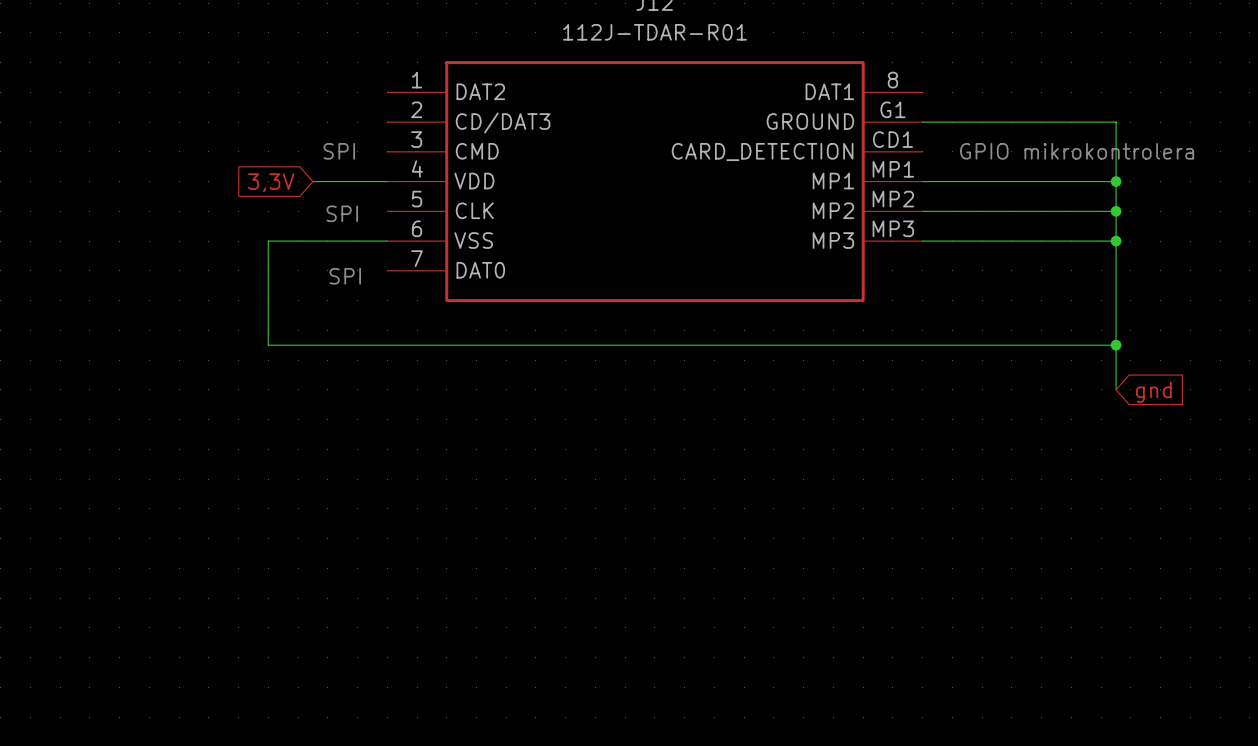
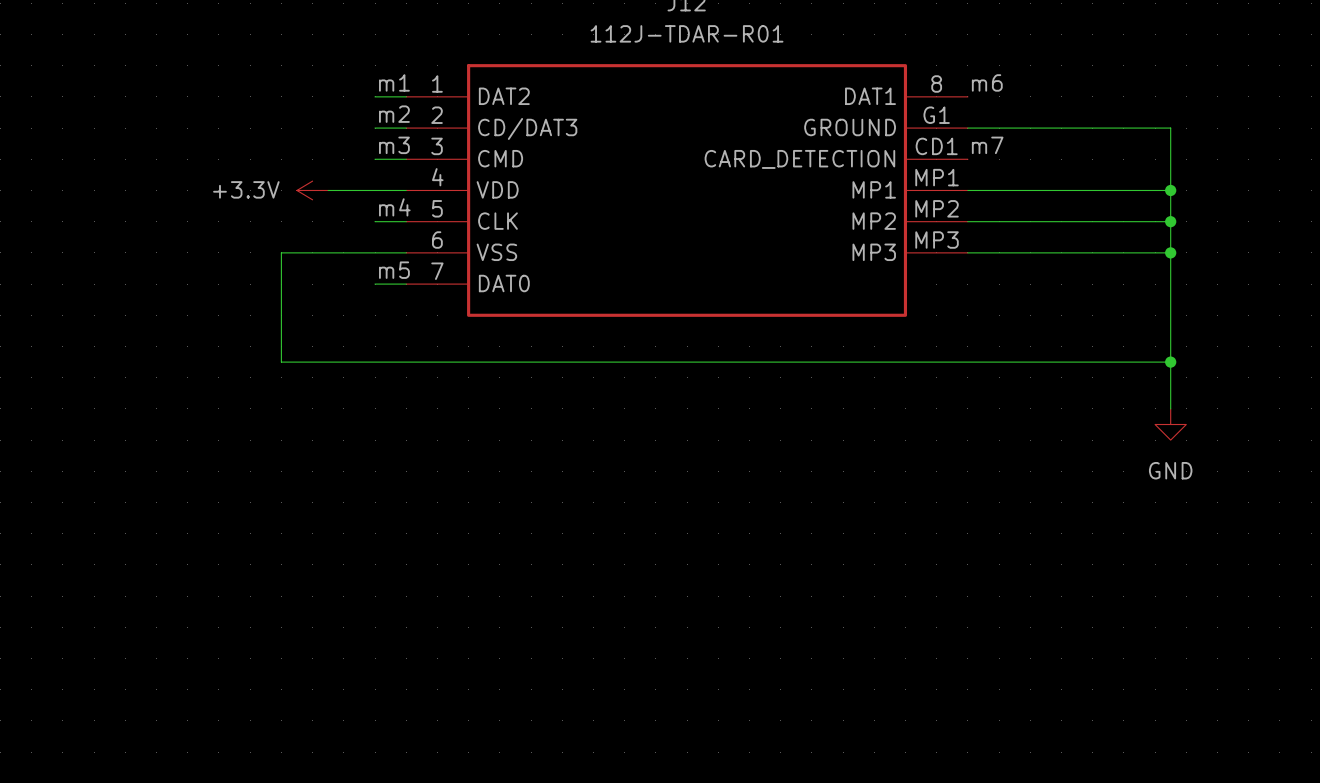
label: none -> m1 (394, 82)
label: none -> m6 (987, 82)
wire: none -> (375, 96) (406, 96)
label: none -> m2 (394, 114)
wire: none -> (375, 128) (406, 128)
label: none -> m3 (394, 145)
label: none -> m7 (987, 145)
text: SPI (339, 151) -> none
wire: none -> (375, 159) (406, 159)
text: GPIO mikrokontrolera (1077, 151) -> none
power symbol: none -> +3.3V (312, 190)
global label: 3,3V (271, 182) -> none
label: none -> m4 (394, 207)
wire: none -> (375, 221) (406, 221)
text: SPI (342, 213) -> none
label: none -> m5 (394, 270)
wire: none -> (375, 284) (406, 284)
text: SPI (345, 276) -> none
global label: gnd (1153, 392) -> none
power symbol: none -> GND (1170, 424)

